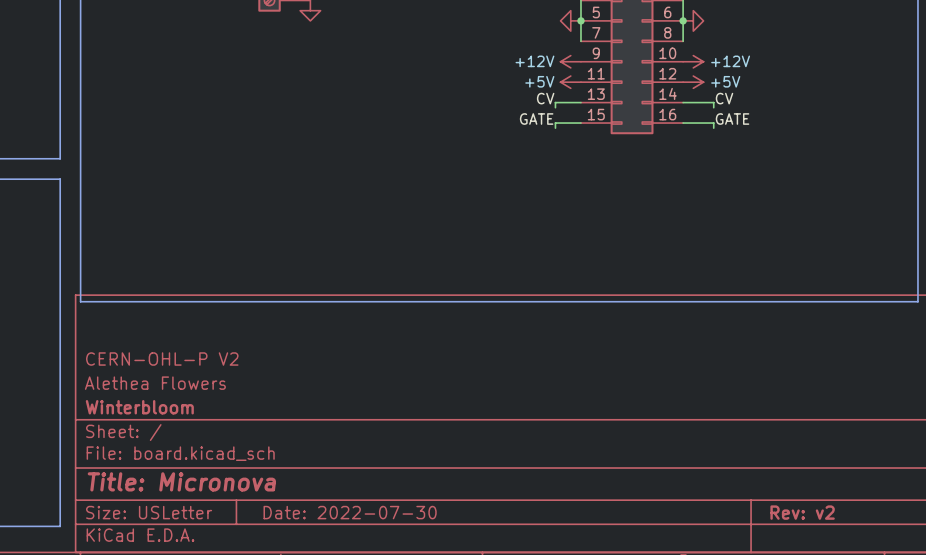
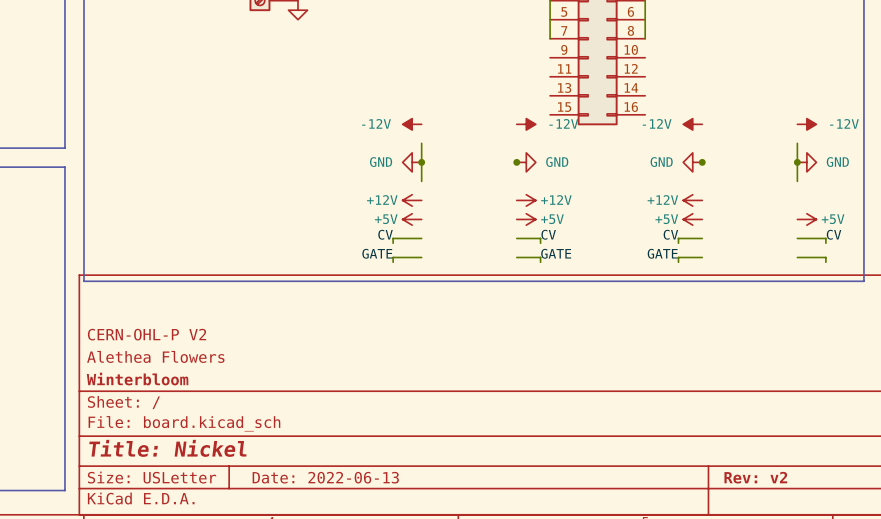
power symbol: (570, 20) -> none
junction: (580, 20) -> none
junction: (683, 20) -> none
power symbol: (693, 20) -> none
power symbol: +12V (570, 61) -> none
power symbol: +12V (693, 61) -> none
power symbol: +5V (570, 82) -> none
power symbol: +5V (693, 82) -> none
label: CV (545, 98) -> none
label: CV (724, 98) -> none
wire: (580, 102) (555, 102) (555, 107) -> none
wire: (683, 102) (713, 102) (713, 107) -> none
label: GATE (536, 119) -> none
label: GATE (732, 119) -> none
wire: (580, 123) (555, 123) (555, 128) -> none
wire: (683, 123) (713, 123) (713, 128) -> none
power symbol: none -> -12V (412, 124)
power symbol: none -> -12V (526, 124)
power symbol: none -> -12V (692, 124)
power symbol: none -> -12V (806, 124)
wire: none -> (421, 143) (421, 181)
wire: none -> (797, 143) (797, 181)
power symbol: none -> GND (412, 162)
junction: none -> (421, 162)
junction: none -> (516, 162)
power symbol: none -> GND (526, 162)
power symbol: none -> GND (692, 162)
junction: none -> (702, 162)
junction: none -> (797, 162)
power symbol: none -> GND (806, 162)
power symbol: none -> +12V (412, 200)
power symbol: none -> +12V (526, 200)
power symbol: none -> +12V (692, 200)
power symbol: none -> +5V (412, 219)
power symbol: none -> +5V (526, 219)
power symbol: none -> +5V (692, 219)
power symbol: none -> +5V (806, 219)
label: none -> CV (385, 234)
label: none -> CV (548, 234)
label: none -> CV (670, 234)
label: none -> CV (834, 234)
wire: none -> (421, 238) (393, 238) (393, 243)
wire: none -> (516, 238) (540, 238) (540, 243)
wire: none -> (702, 238) (678, 238) (678, 243)
wire: none -> (797, 238) (825, 238) (825, 243)
label: none -> GATE (377, 253)
label: none -> GATE (556, 253)
label: none -> GATE (662, 253)
wire: none -> (421, 257) (393, 257) (393, 262)
wire: none -> (516, 257) (540, 257) (540, 262)
wire: none -> (702, 257) (678, 257) (678, 262)
wire: none -> (797, 257) (825, 257) (825, 262)
title block: Title: Micronova (181, 481) -> Title: Nickel (167, 448)
title block: Date: 2022-07-30 (350, 512) -> Date: 2022-06-13 (325, 477)

